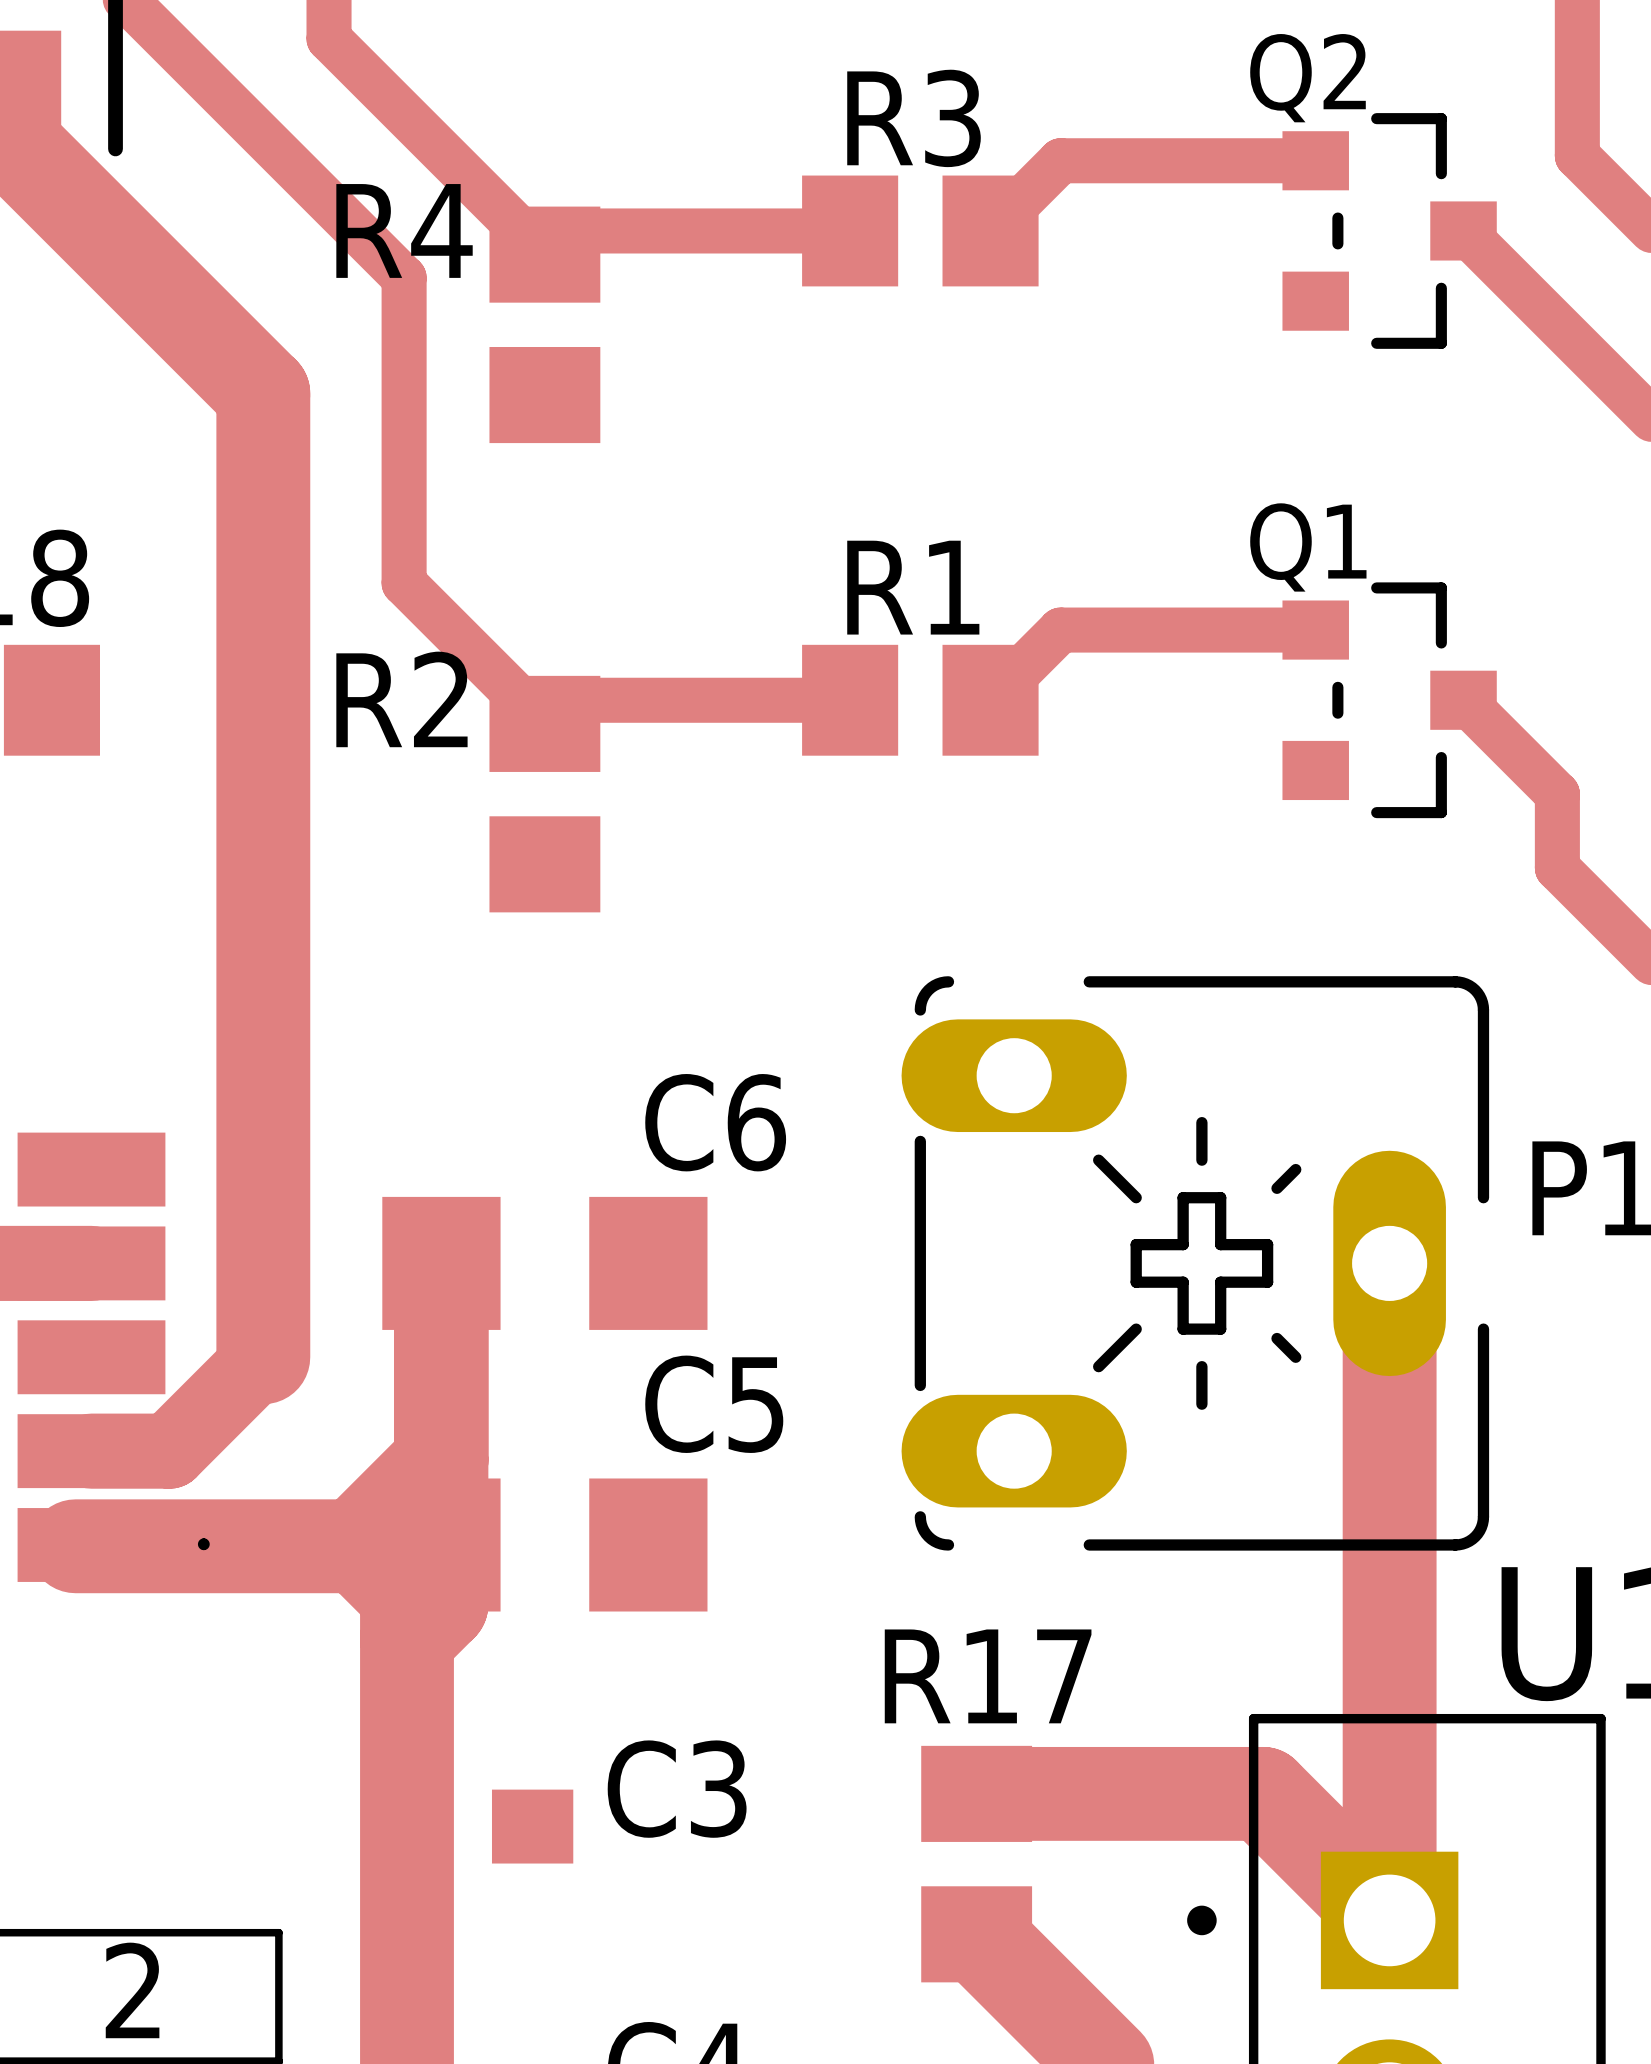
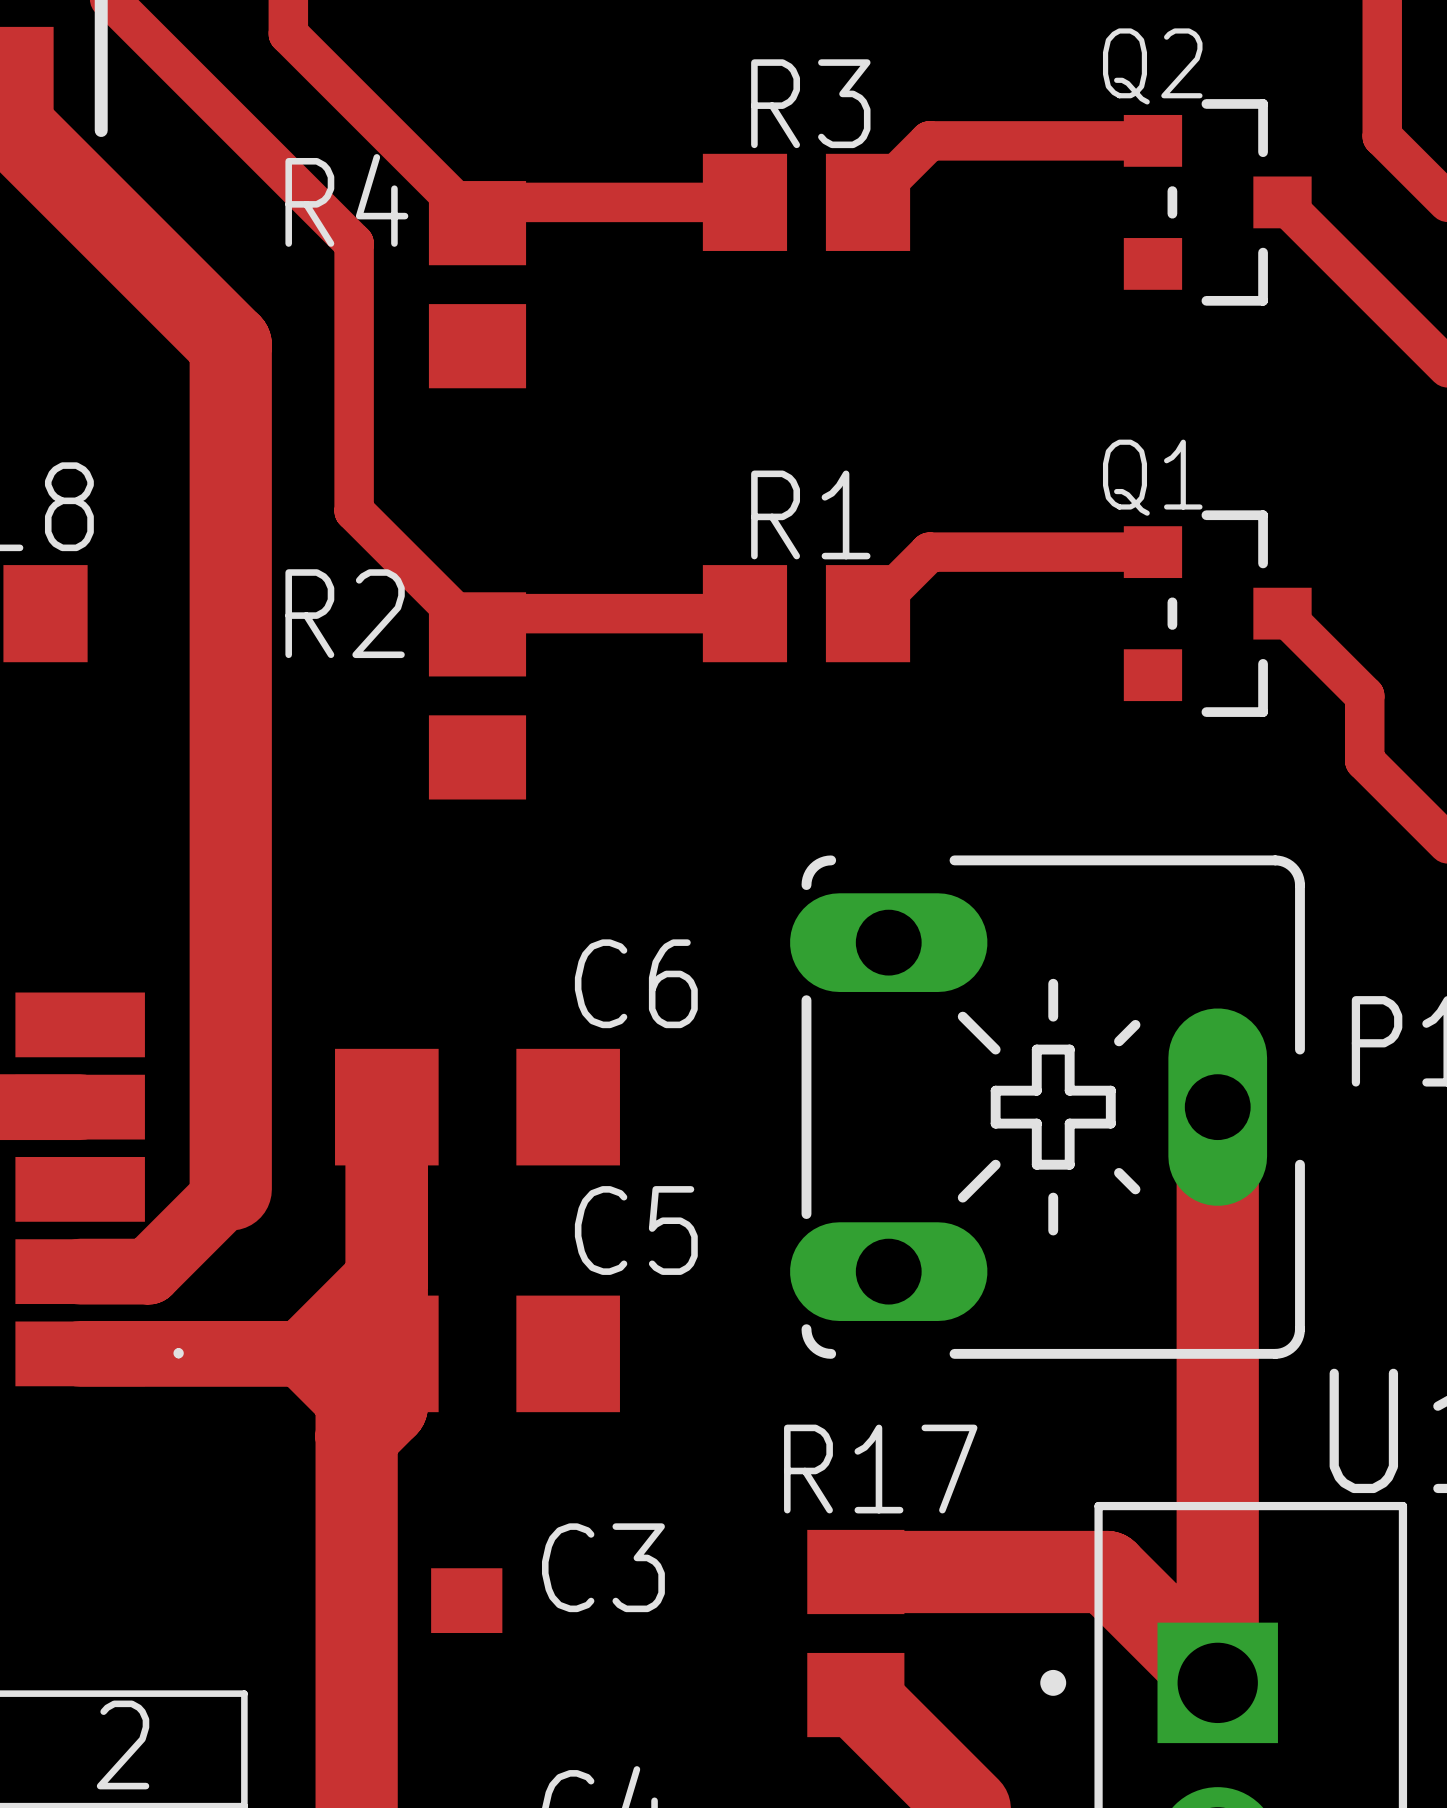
track: (75, 1546) (358, 1546) -> (80, 1353) (314, 1355)

